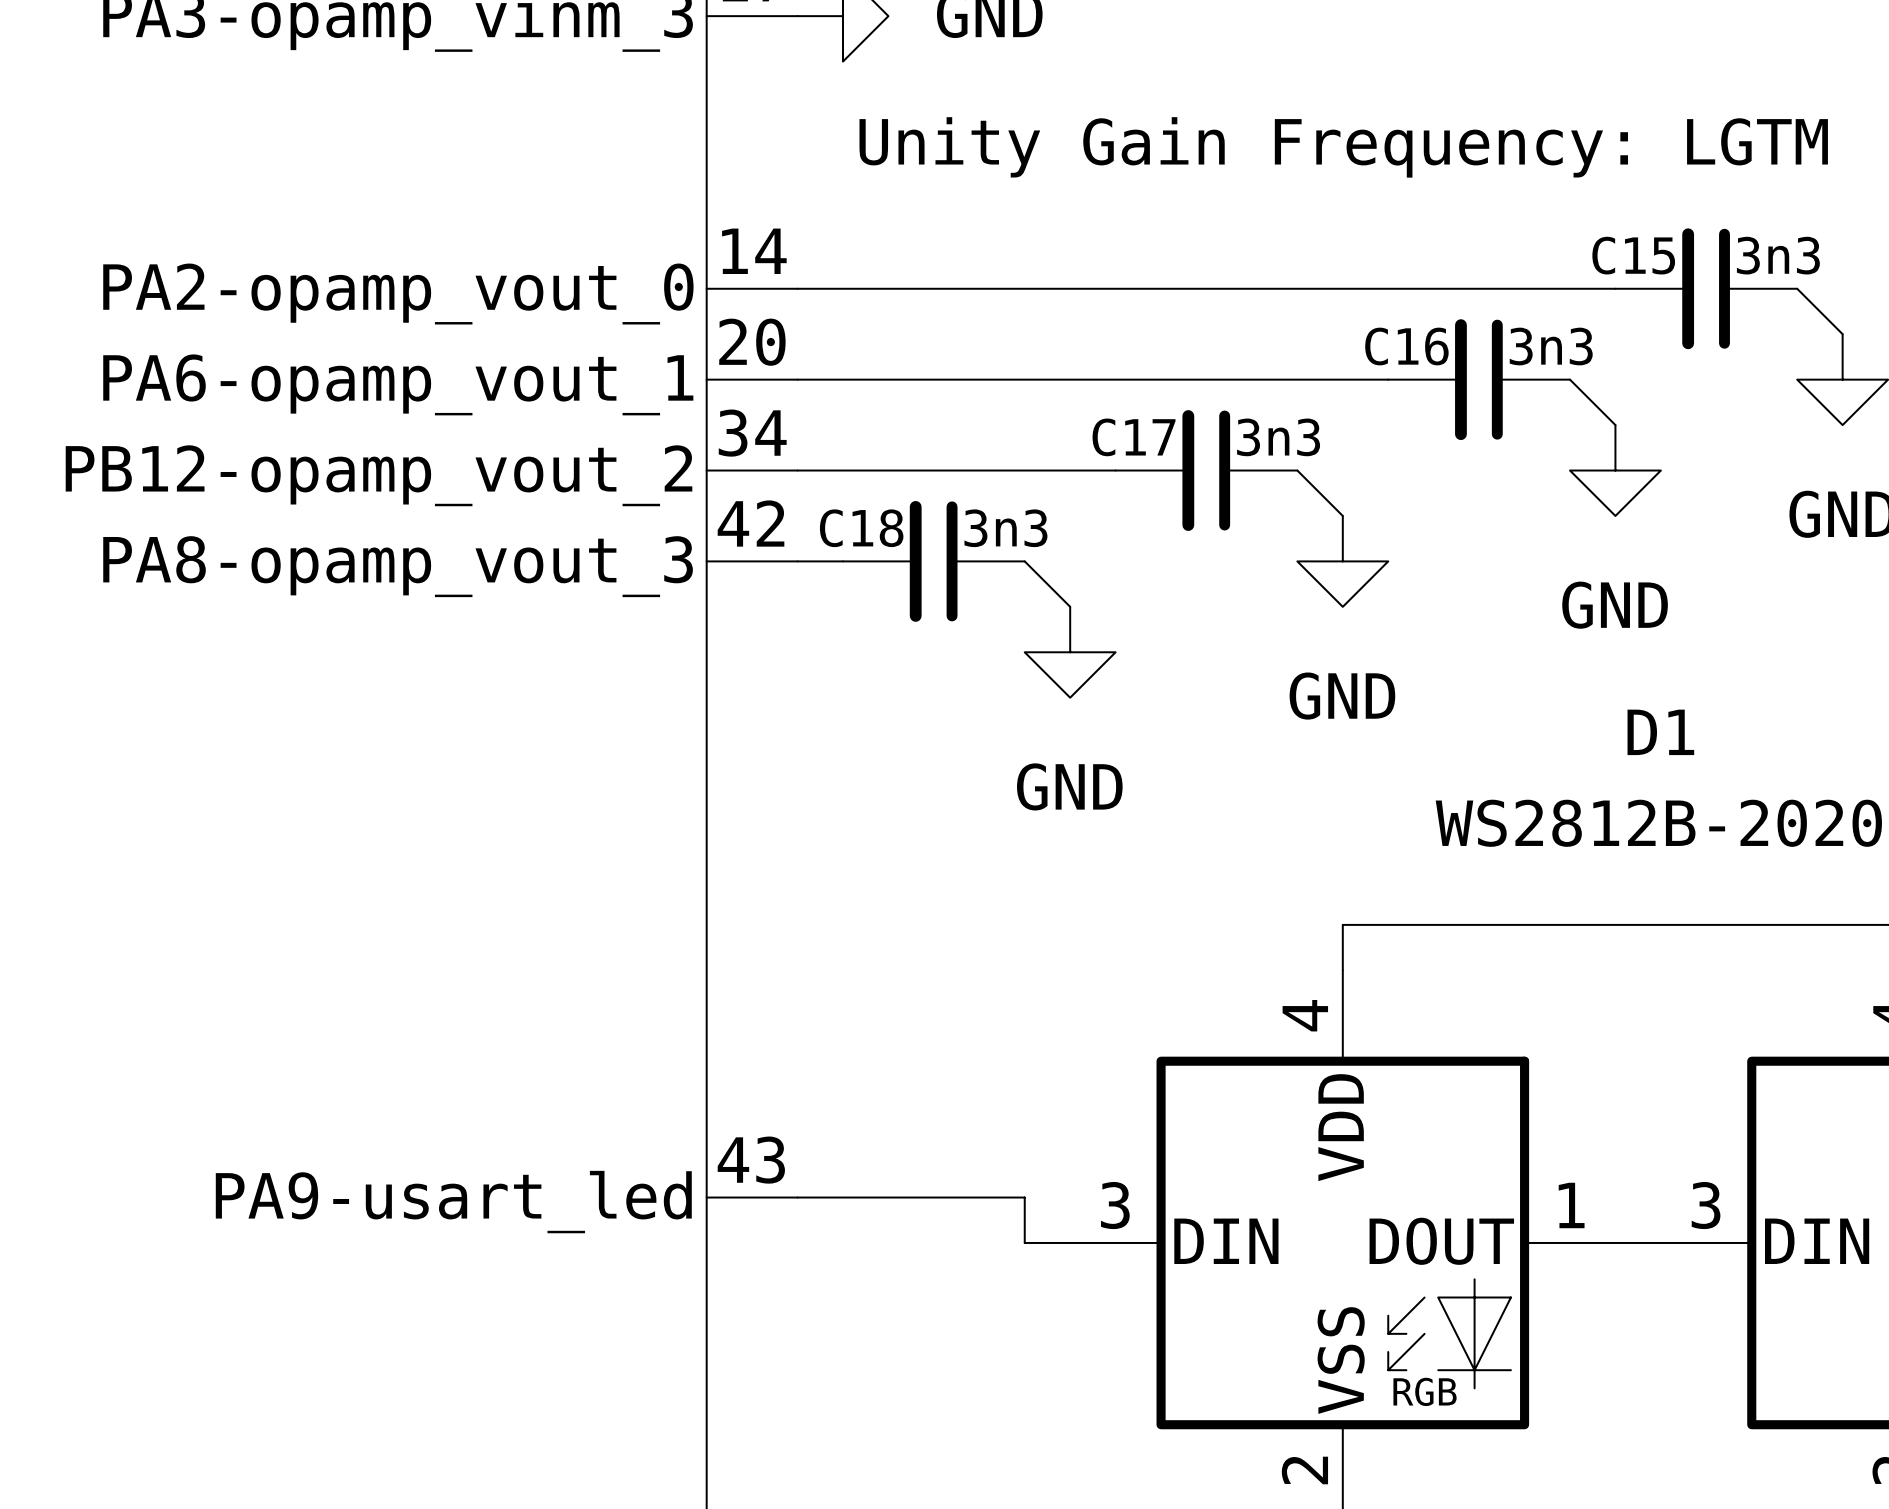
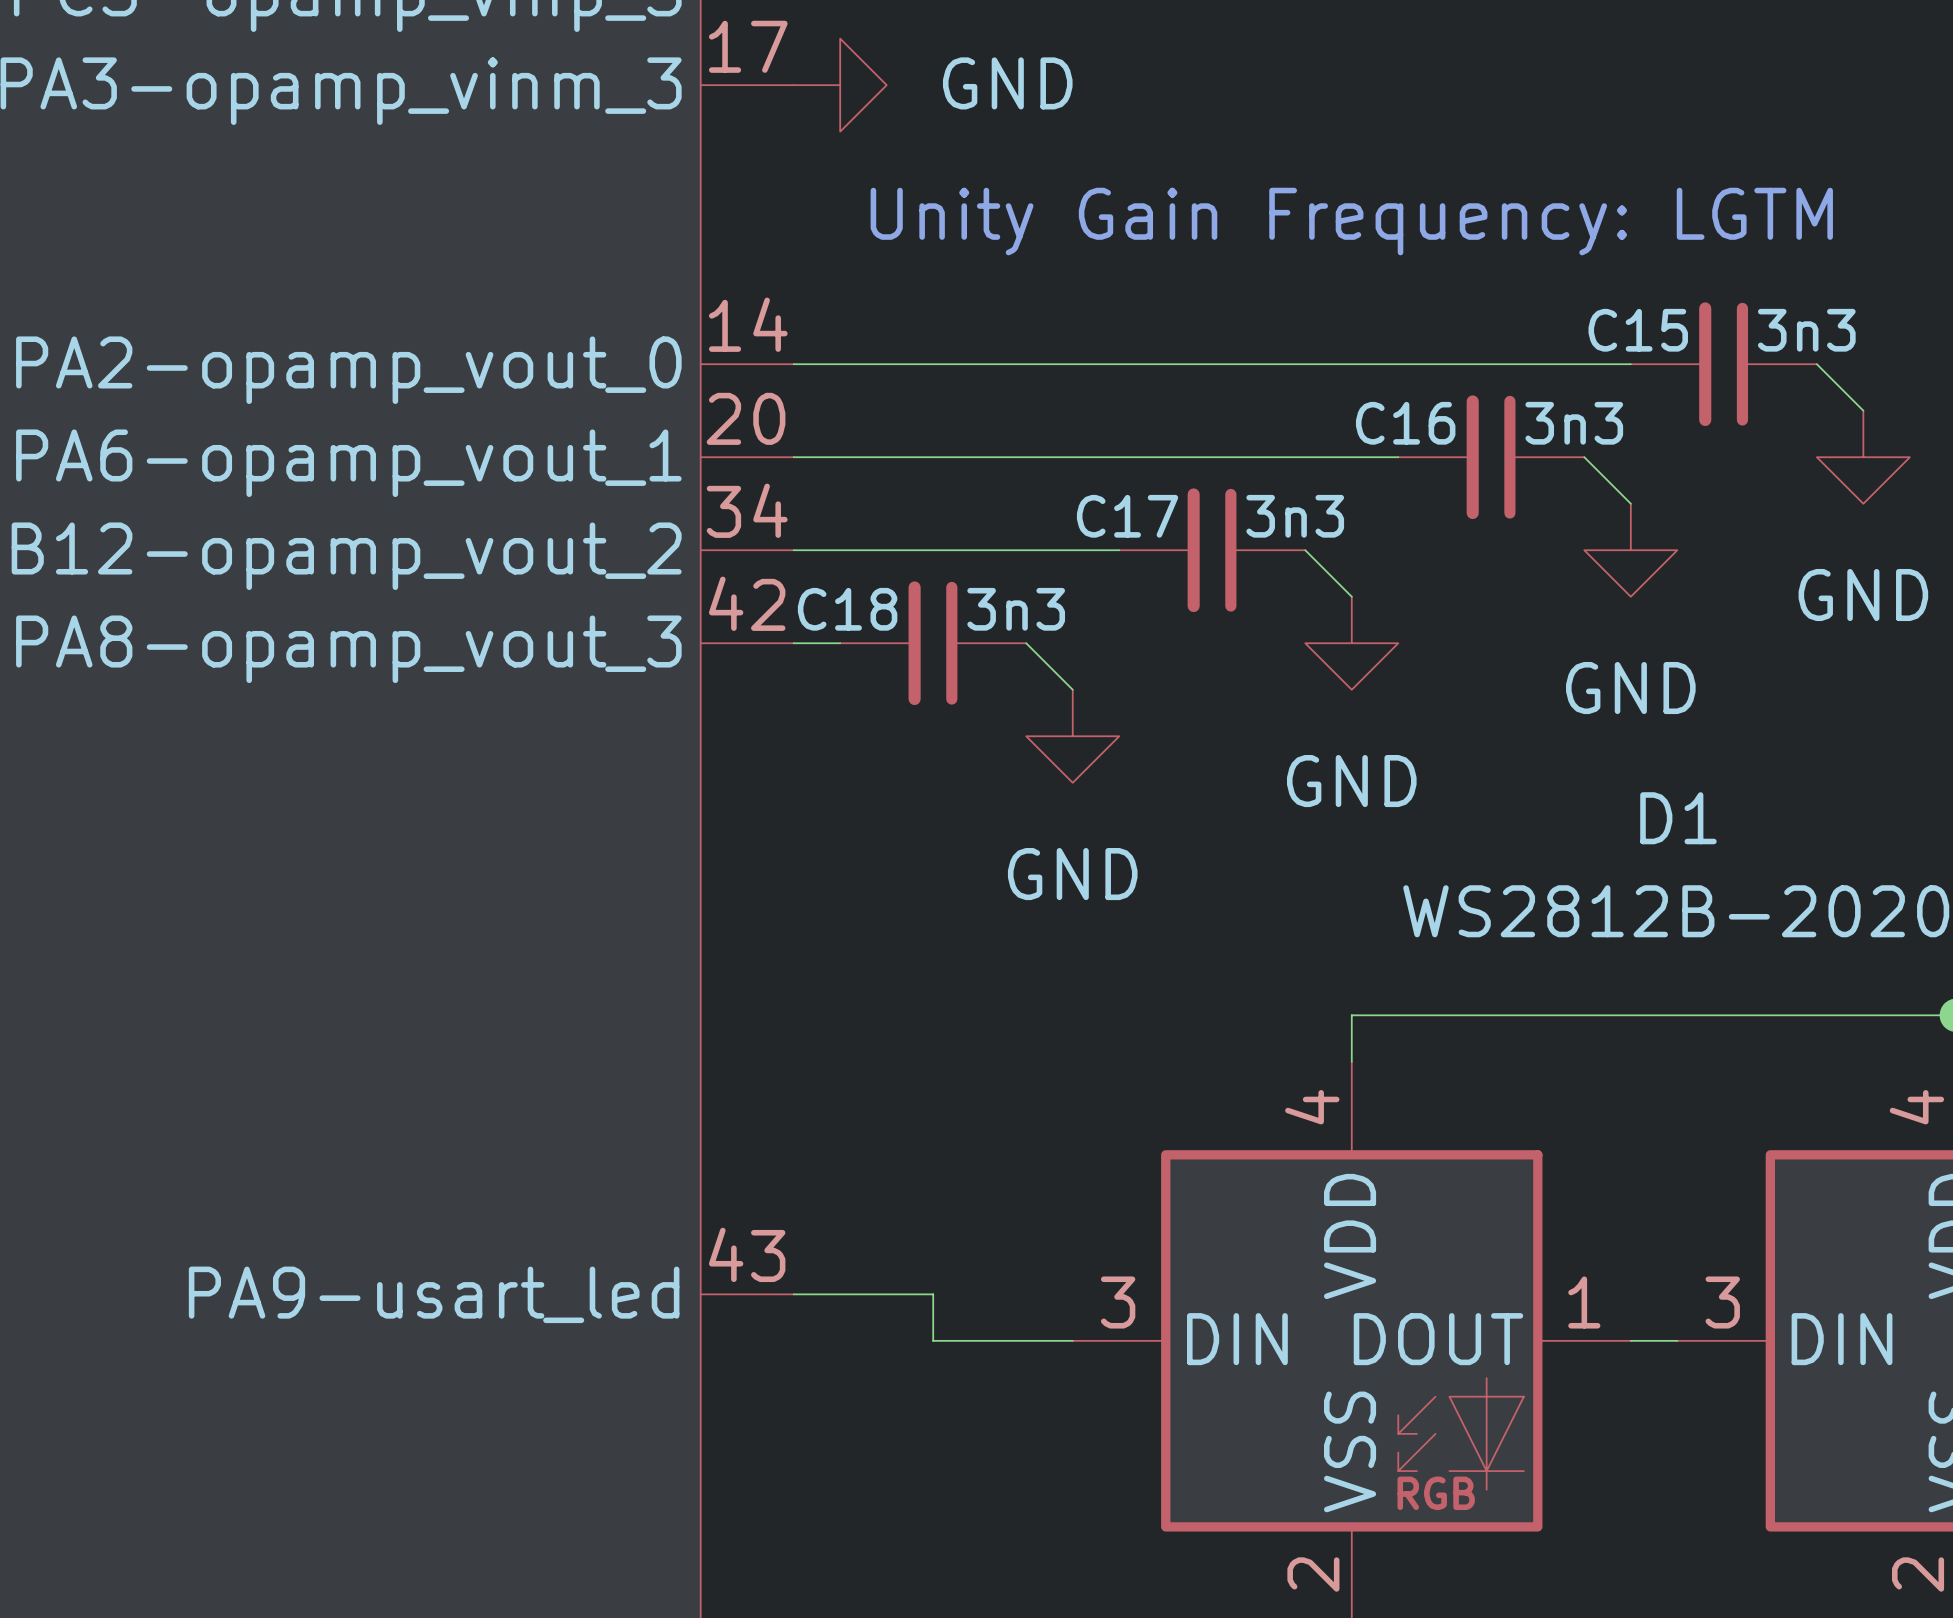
wire: (933, 1197) (1024, 1197) (1024, 1242) -> (933, 1294) (933, 1340) (1026, 1340)

